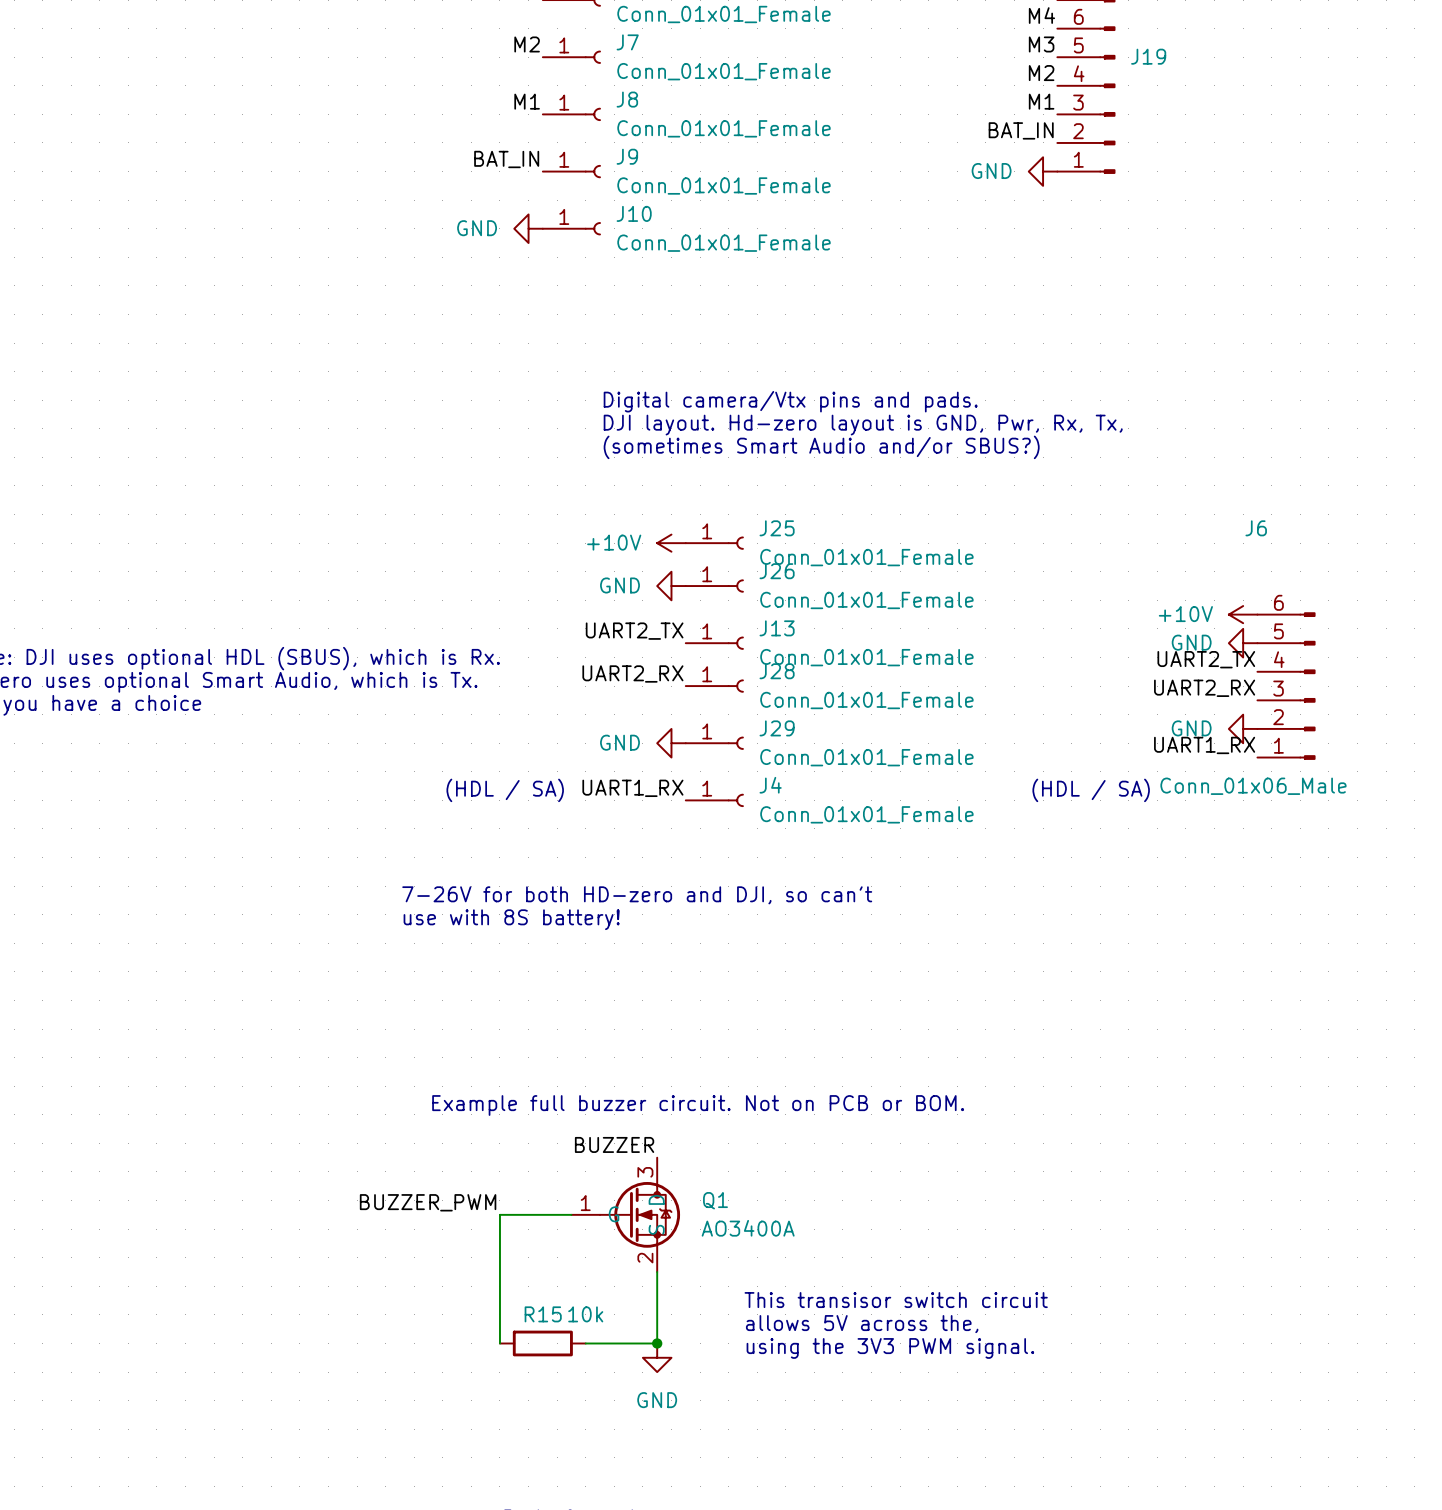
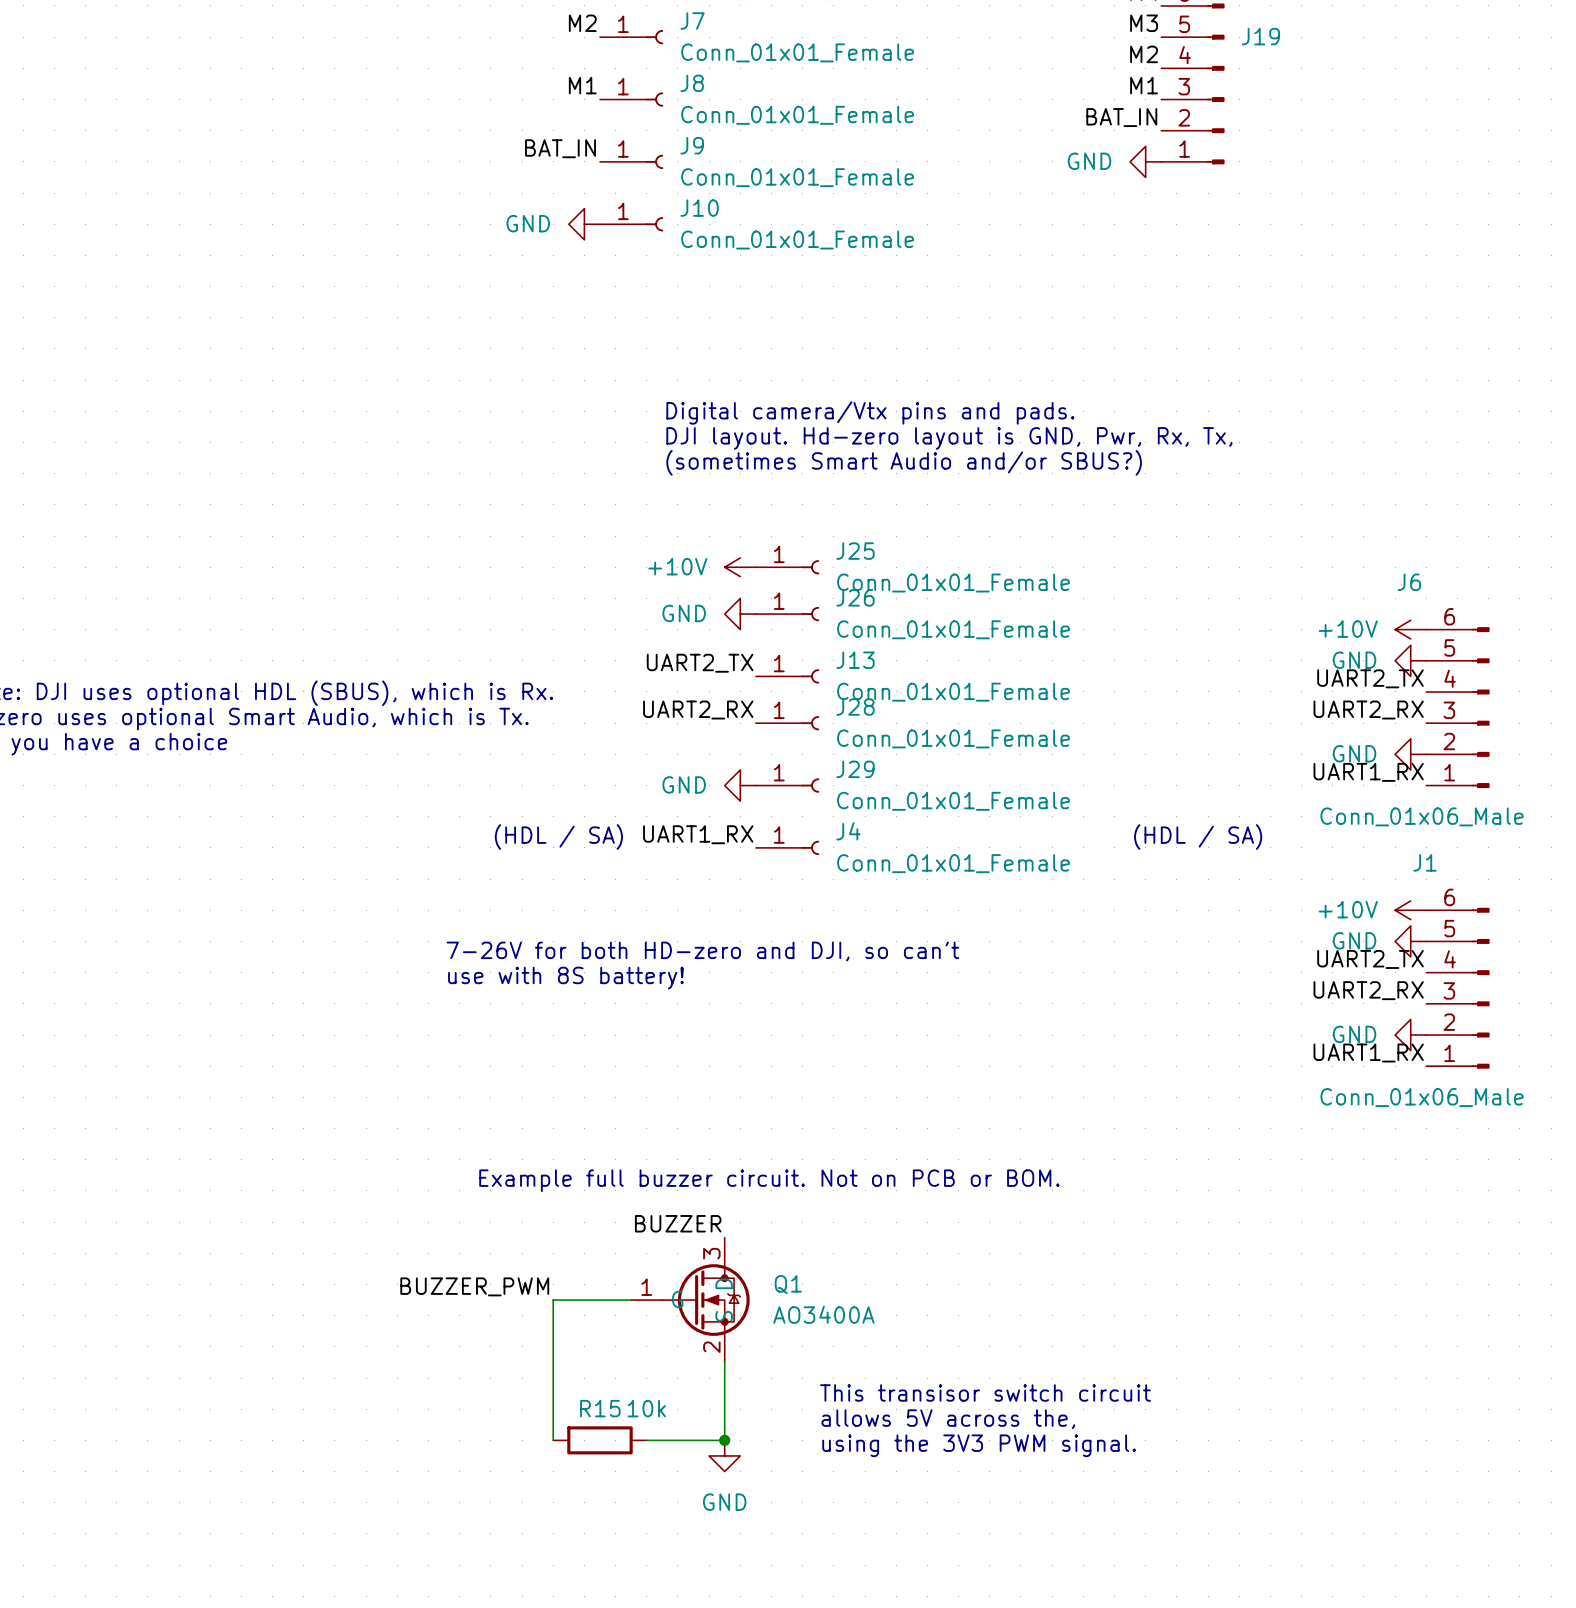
J6 name position: J6 (1256, 528) -> J6 (1409, 582)
power symbol position: +10V (1243, 614) -> +10V (1410, 629)
power symbol: none -> GND (1410, 660)
power symbol: GND (1243, 643) -> none
label position: UART2_TX (1206, 659) -> UART2_TX (1370, 678)
J6 position: (1286, 686) -> (1457, 707)
label position: UART2_RX (1204, 688) -> UART2_RX (1368, 710)
power symbol: none -> GND (1410, 754)
power symbol: GND (1243, 728) -> none
label position: UART1_RX (1204, 745) -> UART1_RX (1368, 772)
power symbol: none -> +10V (1410, 910)
power symbol: none -> GND (1410, 941)
label: none -> UART2_TX (1370, 959)
J1: none -> Conn_01x06_Male (1457, 988)
label: none -> UART2_RX (1368, 990)
power symbol: none -> GND (1410, 1035)
label: none -> UART1_RX (1368, 1053)

